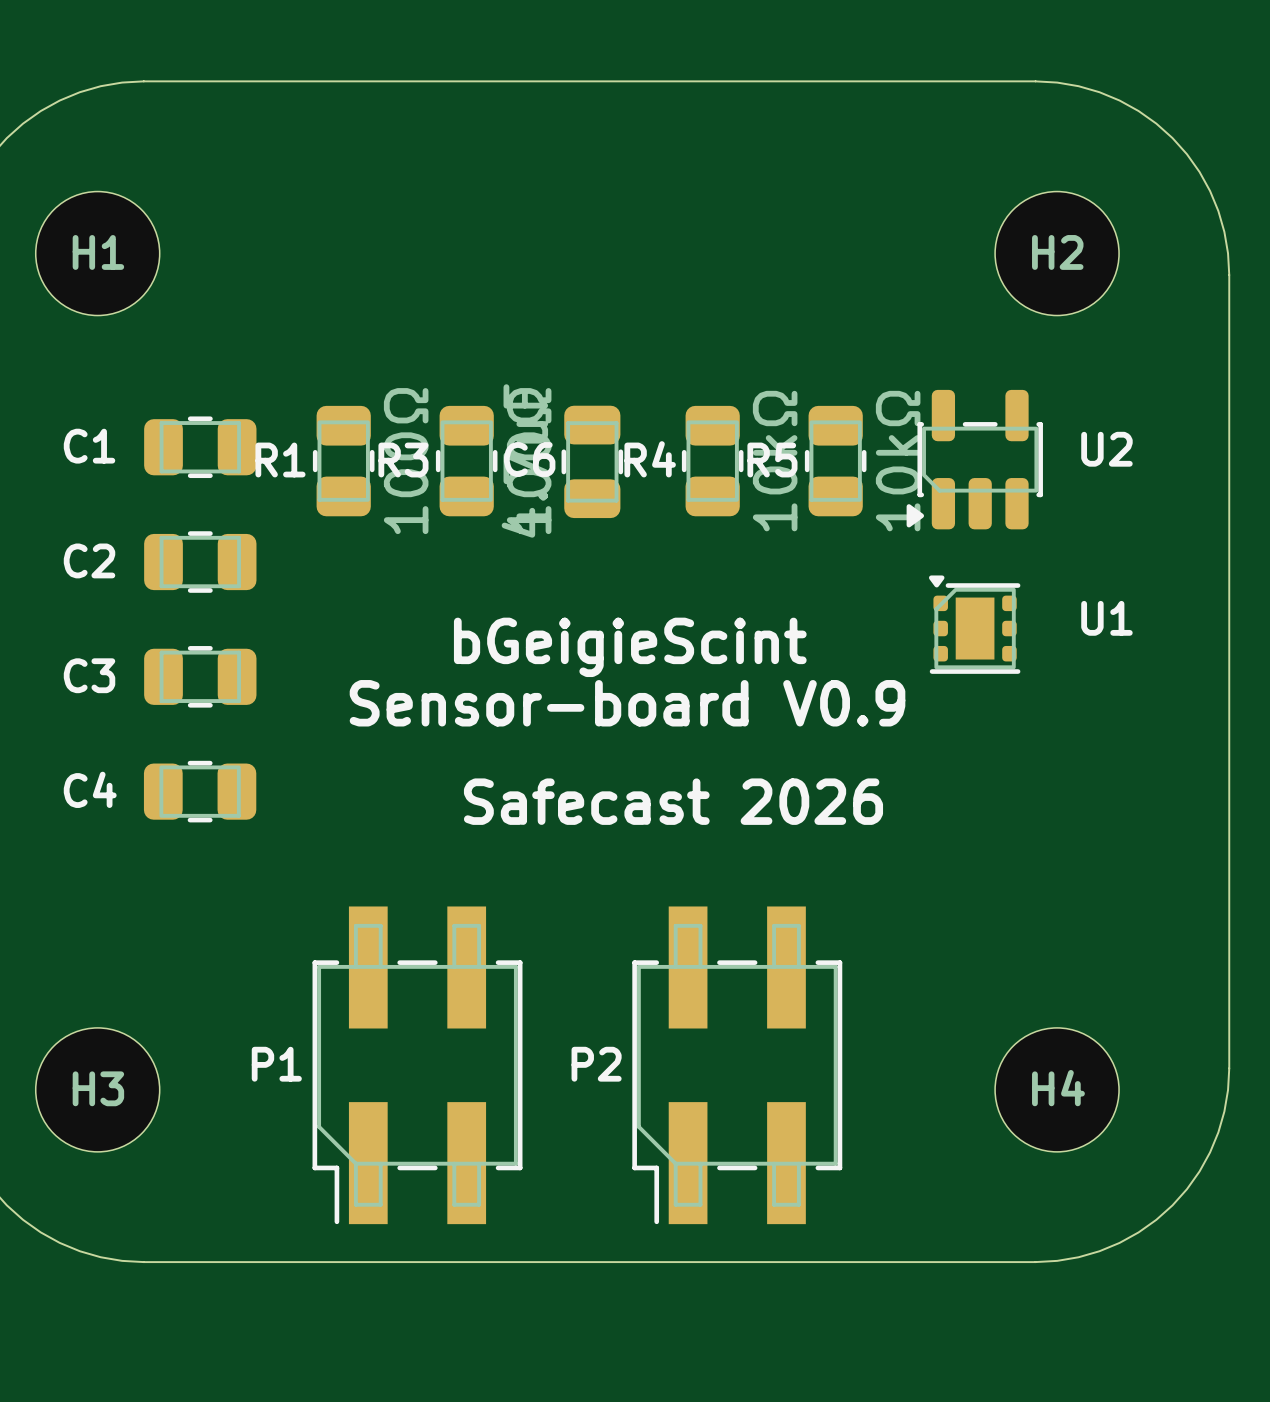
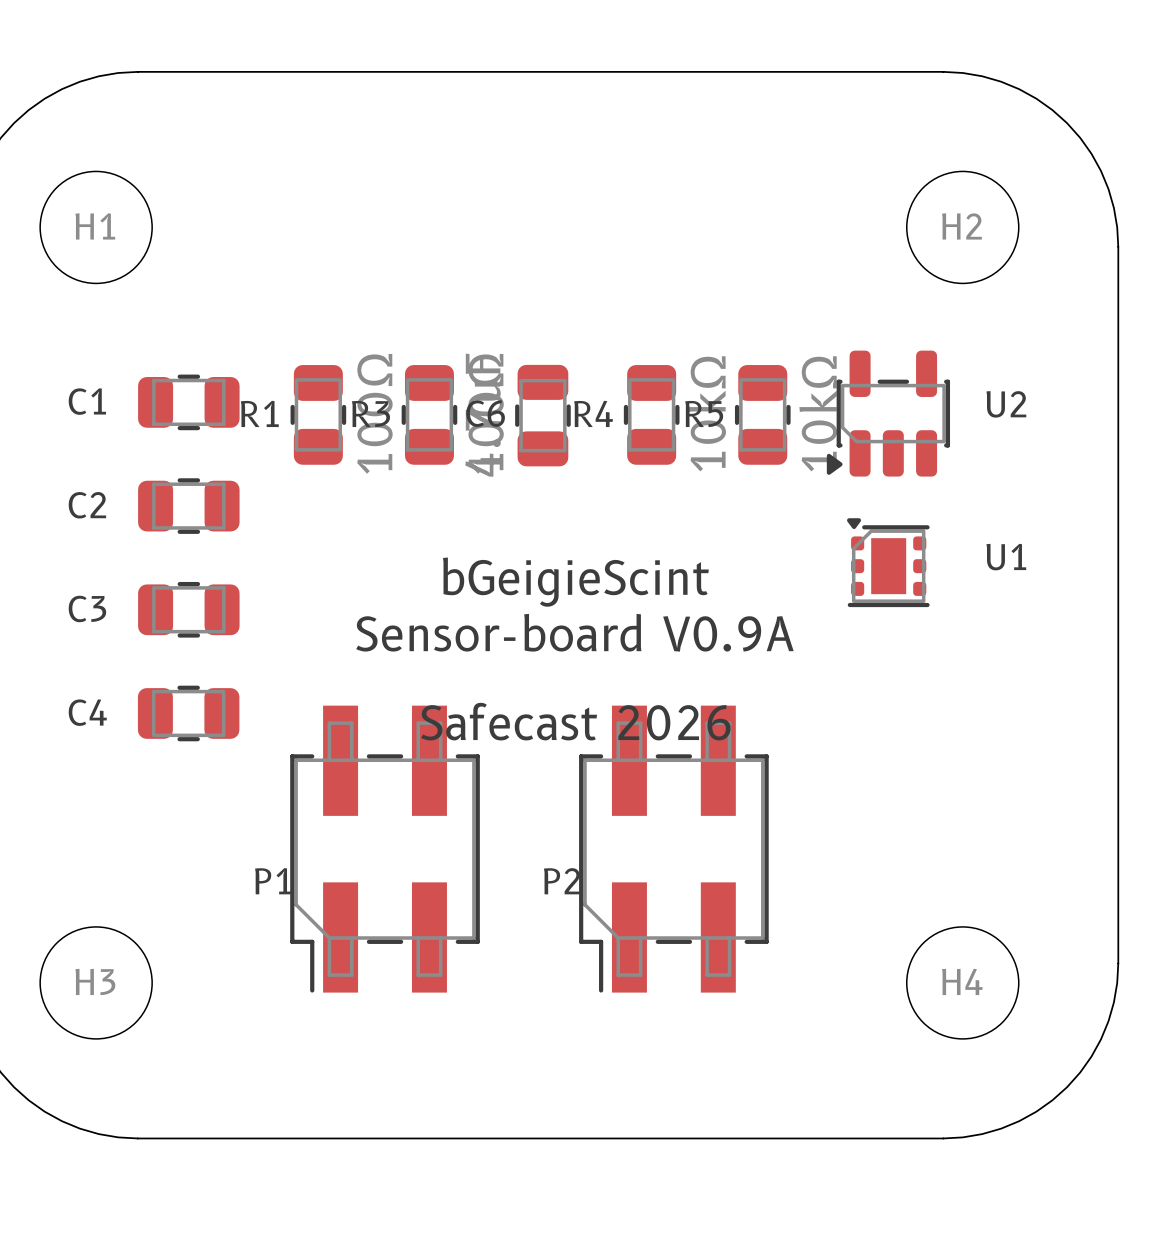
text: Sensor-board V0.9 (627, 703) -> Sensor-board V0.9A (574, 632)
P1 name position: P1 (276, 1064) -> P1 (273, 881)
P2 name position: P2 (596, 1064) -> P2 (562, 881)
P1 position: (417, 1065) -> (385, 849)
P2 position: (737, 1065) -> (673, 849)

